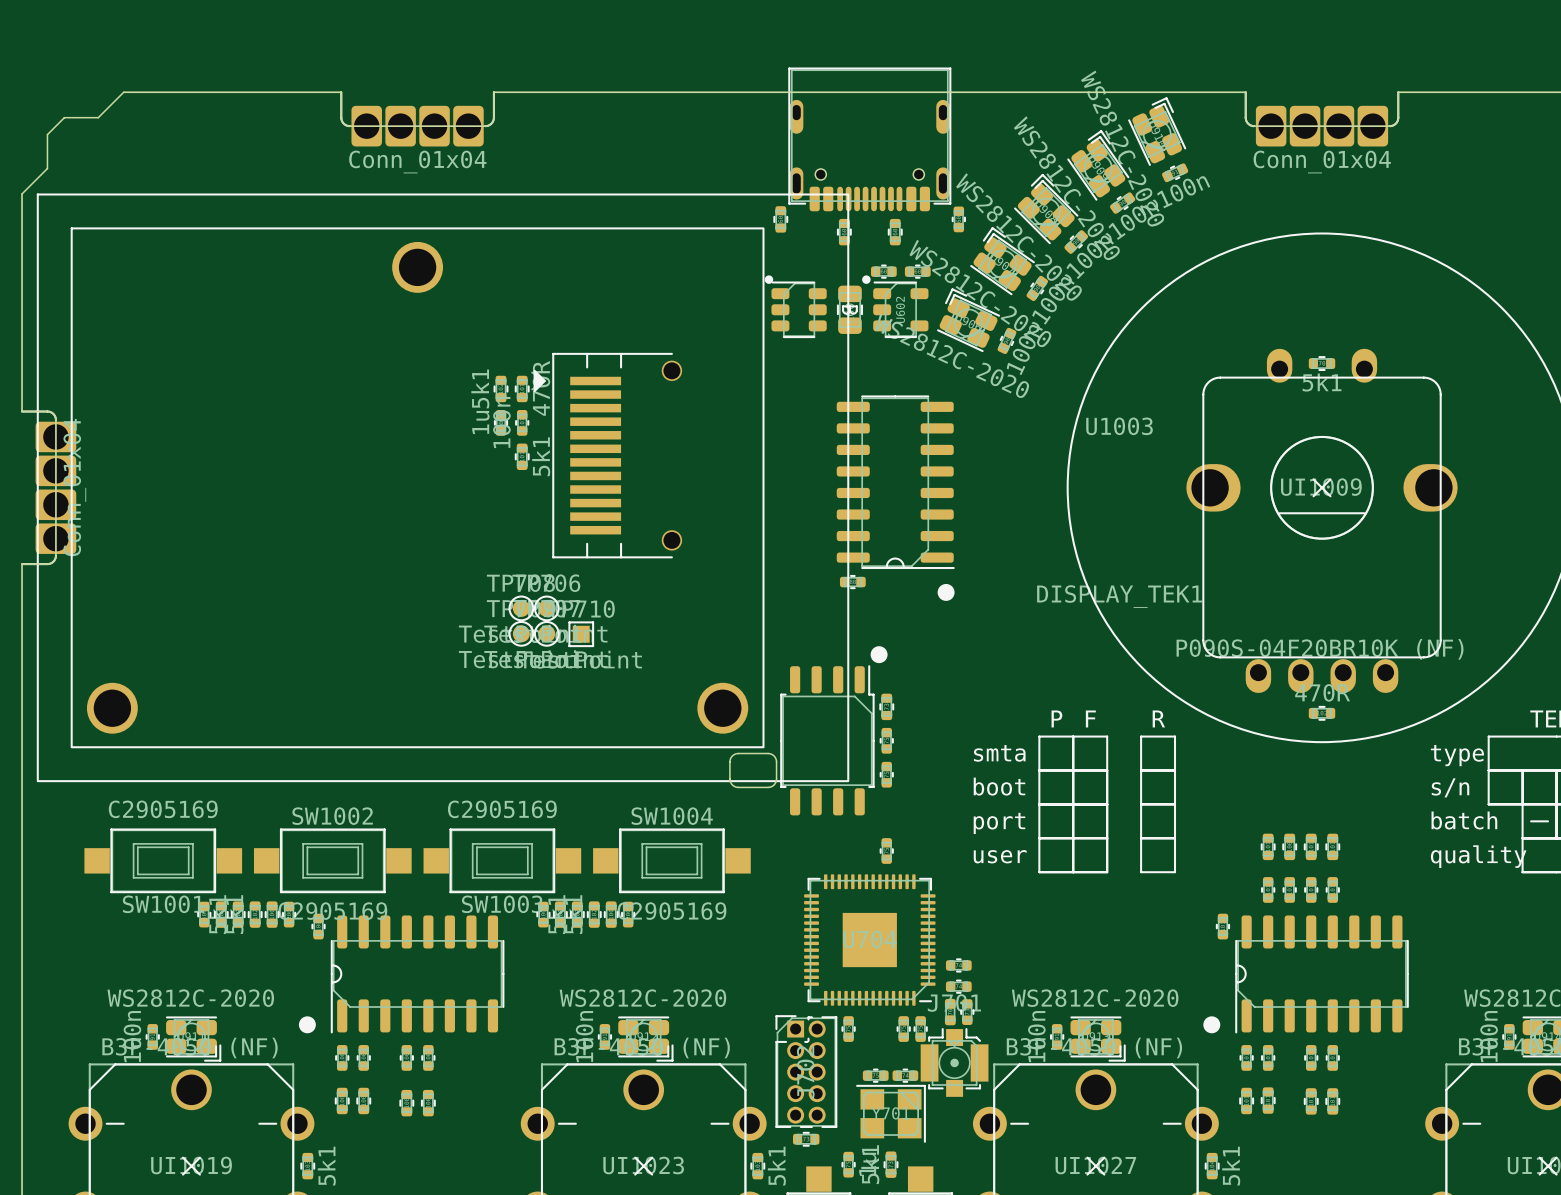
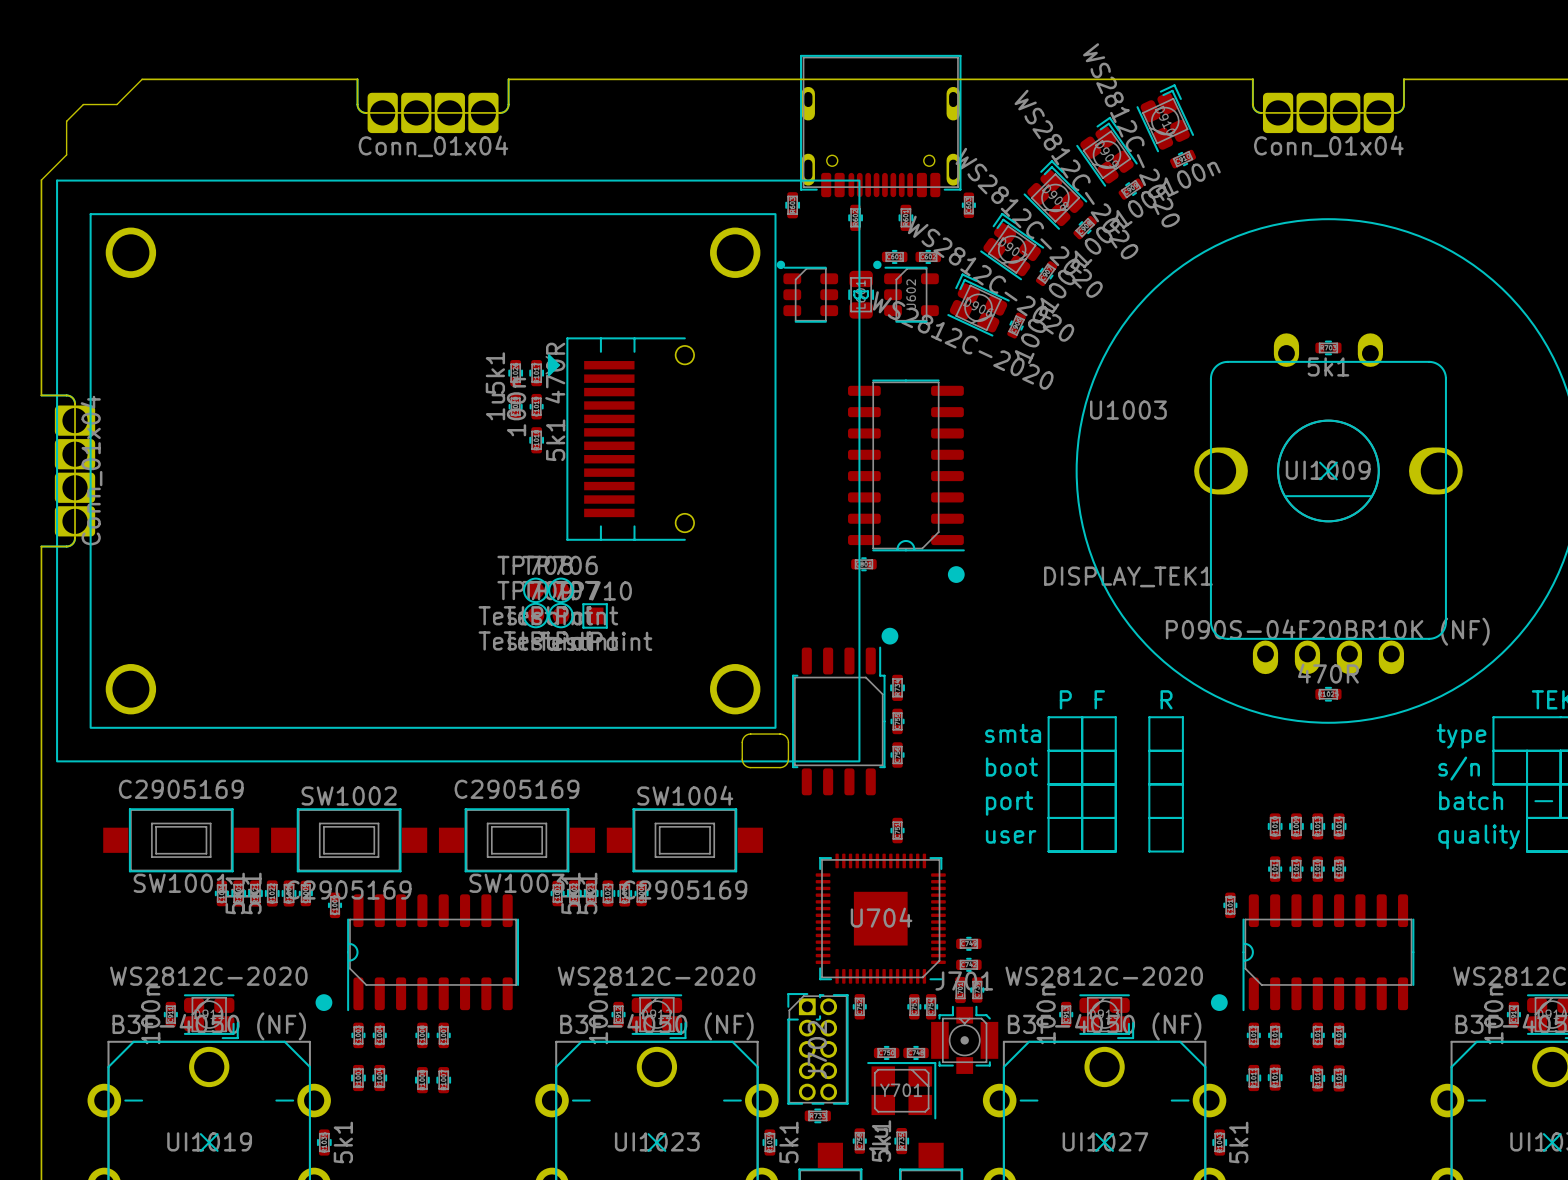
U1003 footprint: [36, 193, 850, 783] -> [56, 179, 861, 763]

